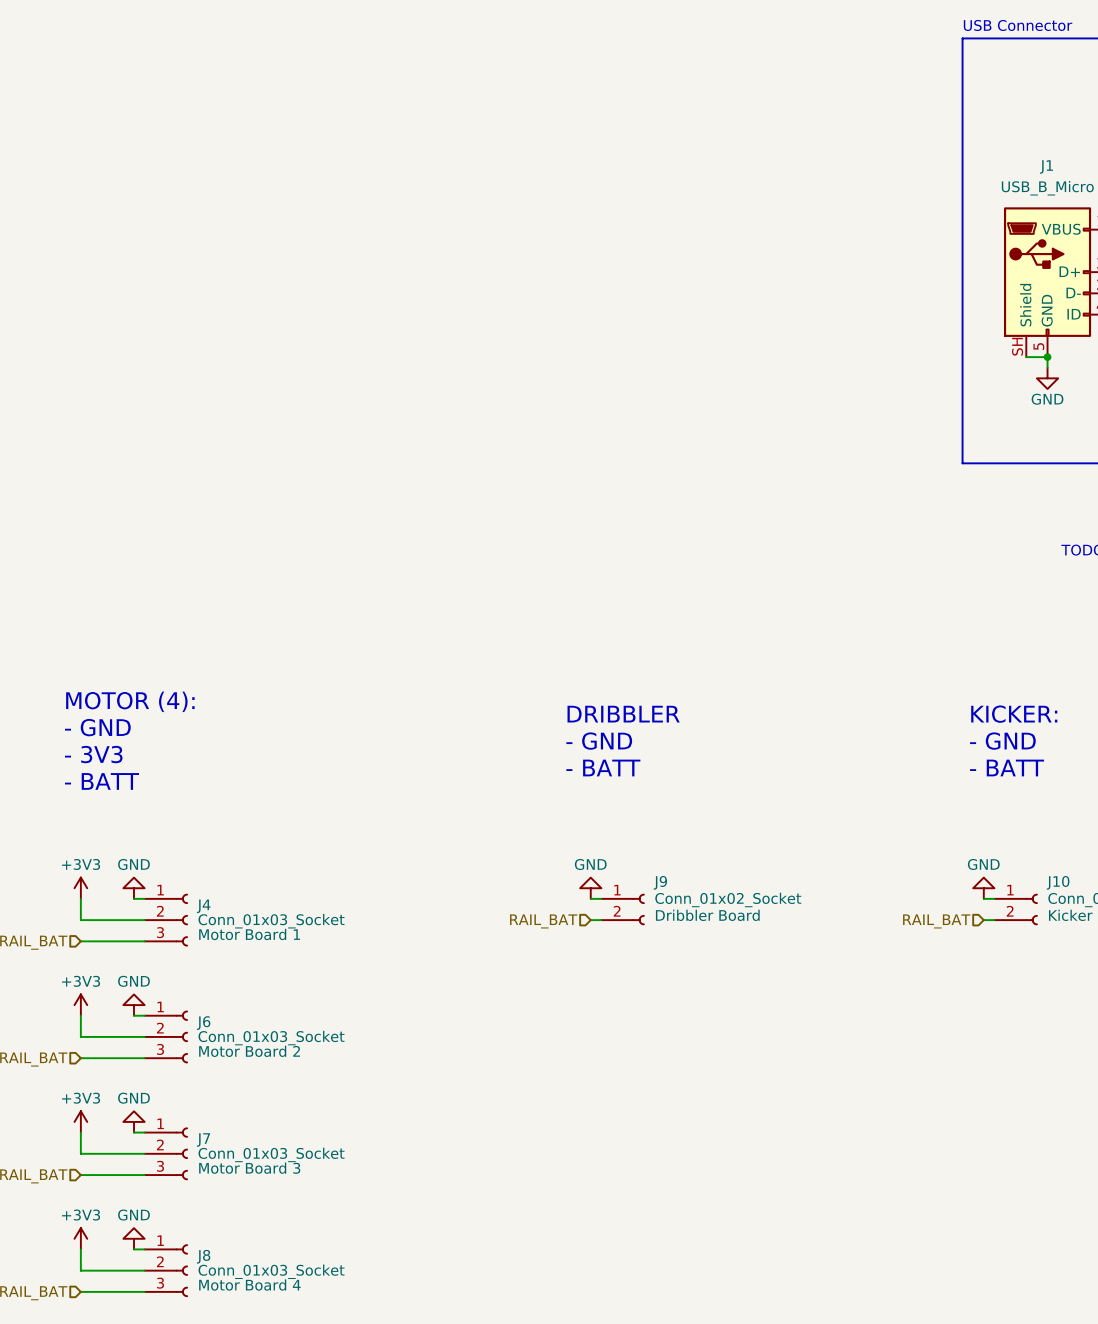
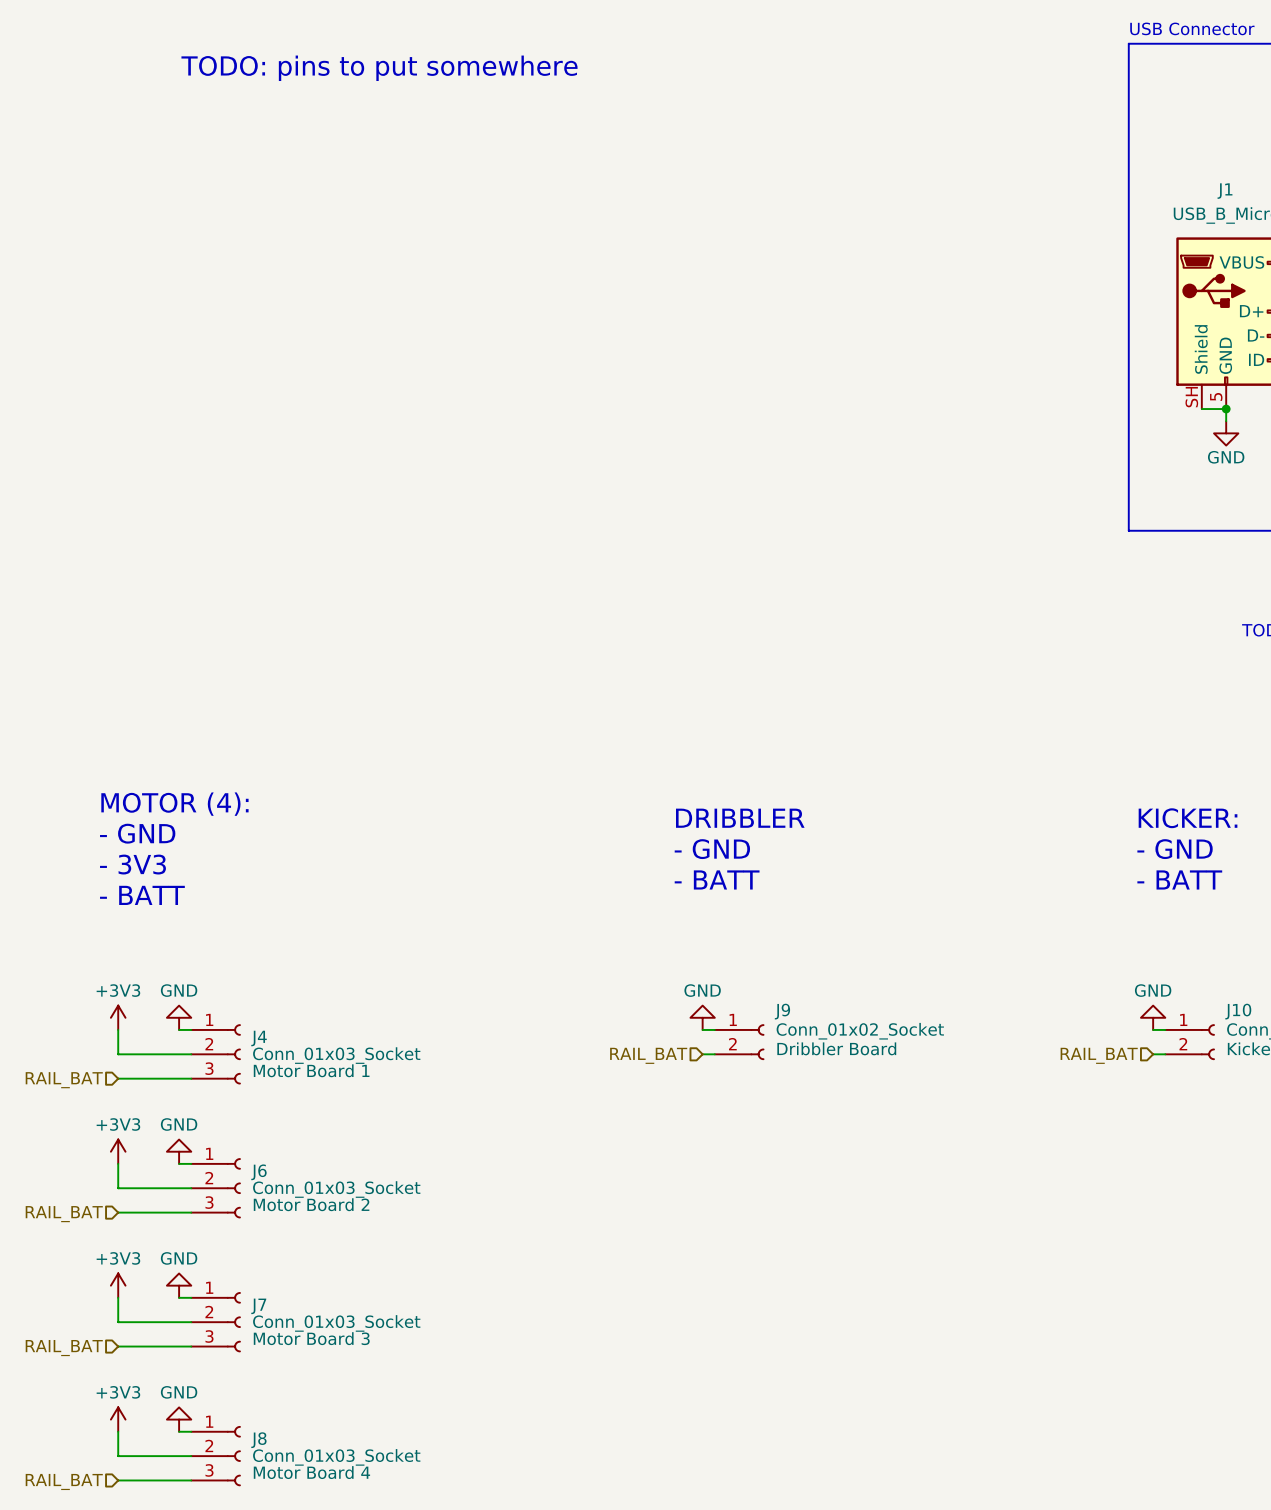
text: none -> TODO: pins to put somewhere (379, 68)

